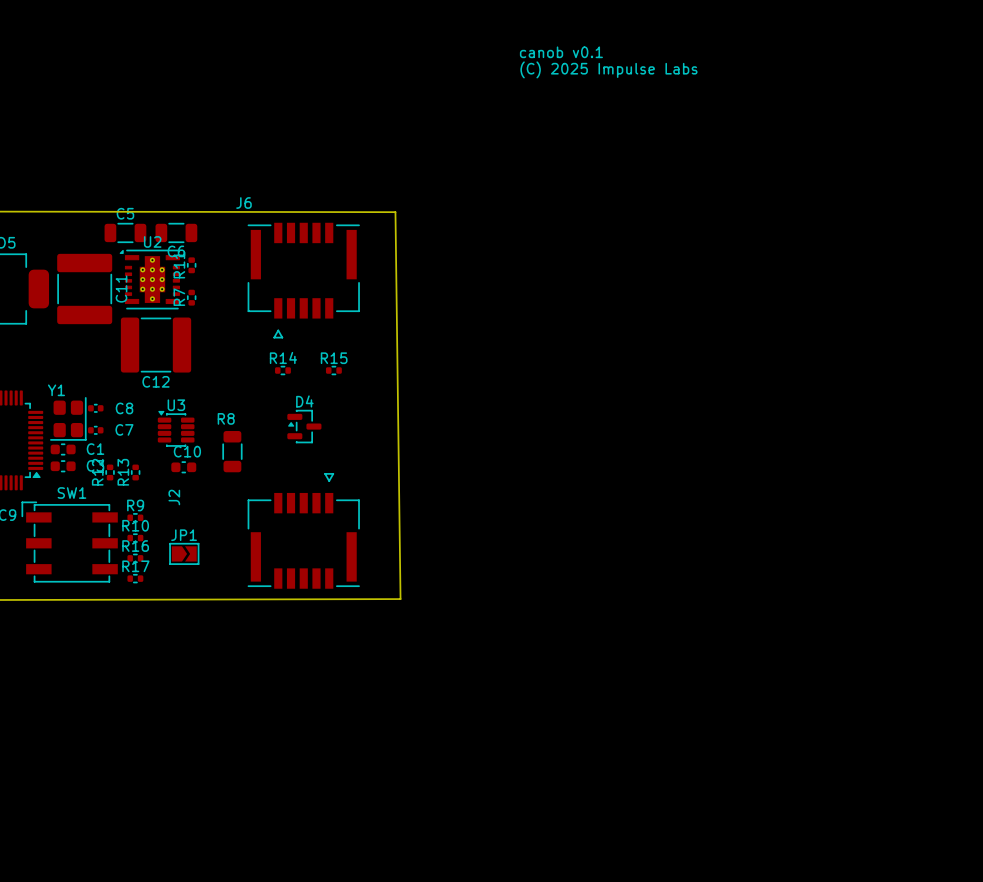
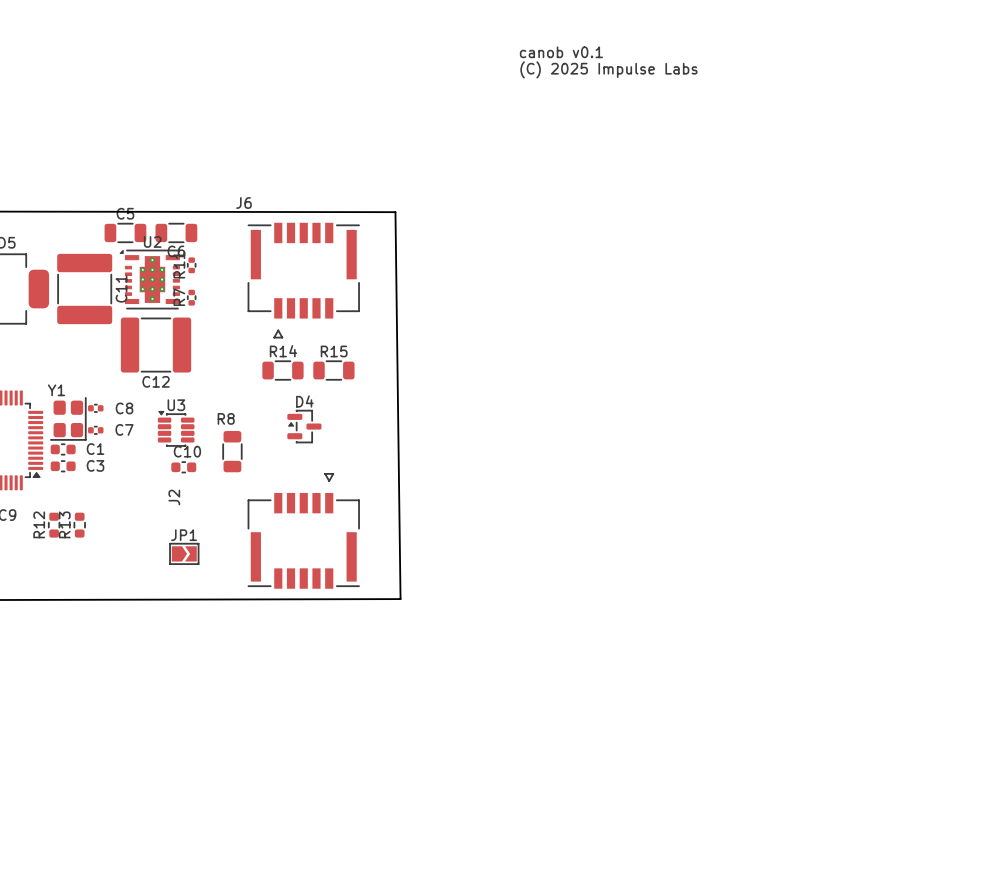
R14 footprint: [275, 366, 291, 375] -> [262, 360, 304, 381]
R15 footprint: [325, 366, 342, 375] -> [313, 360, 355, 381]
R12 footprint: [105, 464, 115, 481] -> [48, 512, 61, 538]
R13 footprint: [131, 464, 141, 481] -> [73, 512, 86, 538]
R9: (135, 517) -> none
R10: (135, 538) -> none
SW1: (69, 542) -> none
R16: (135, 558) -> none
R17: (135, 578) -> none

